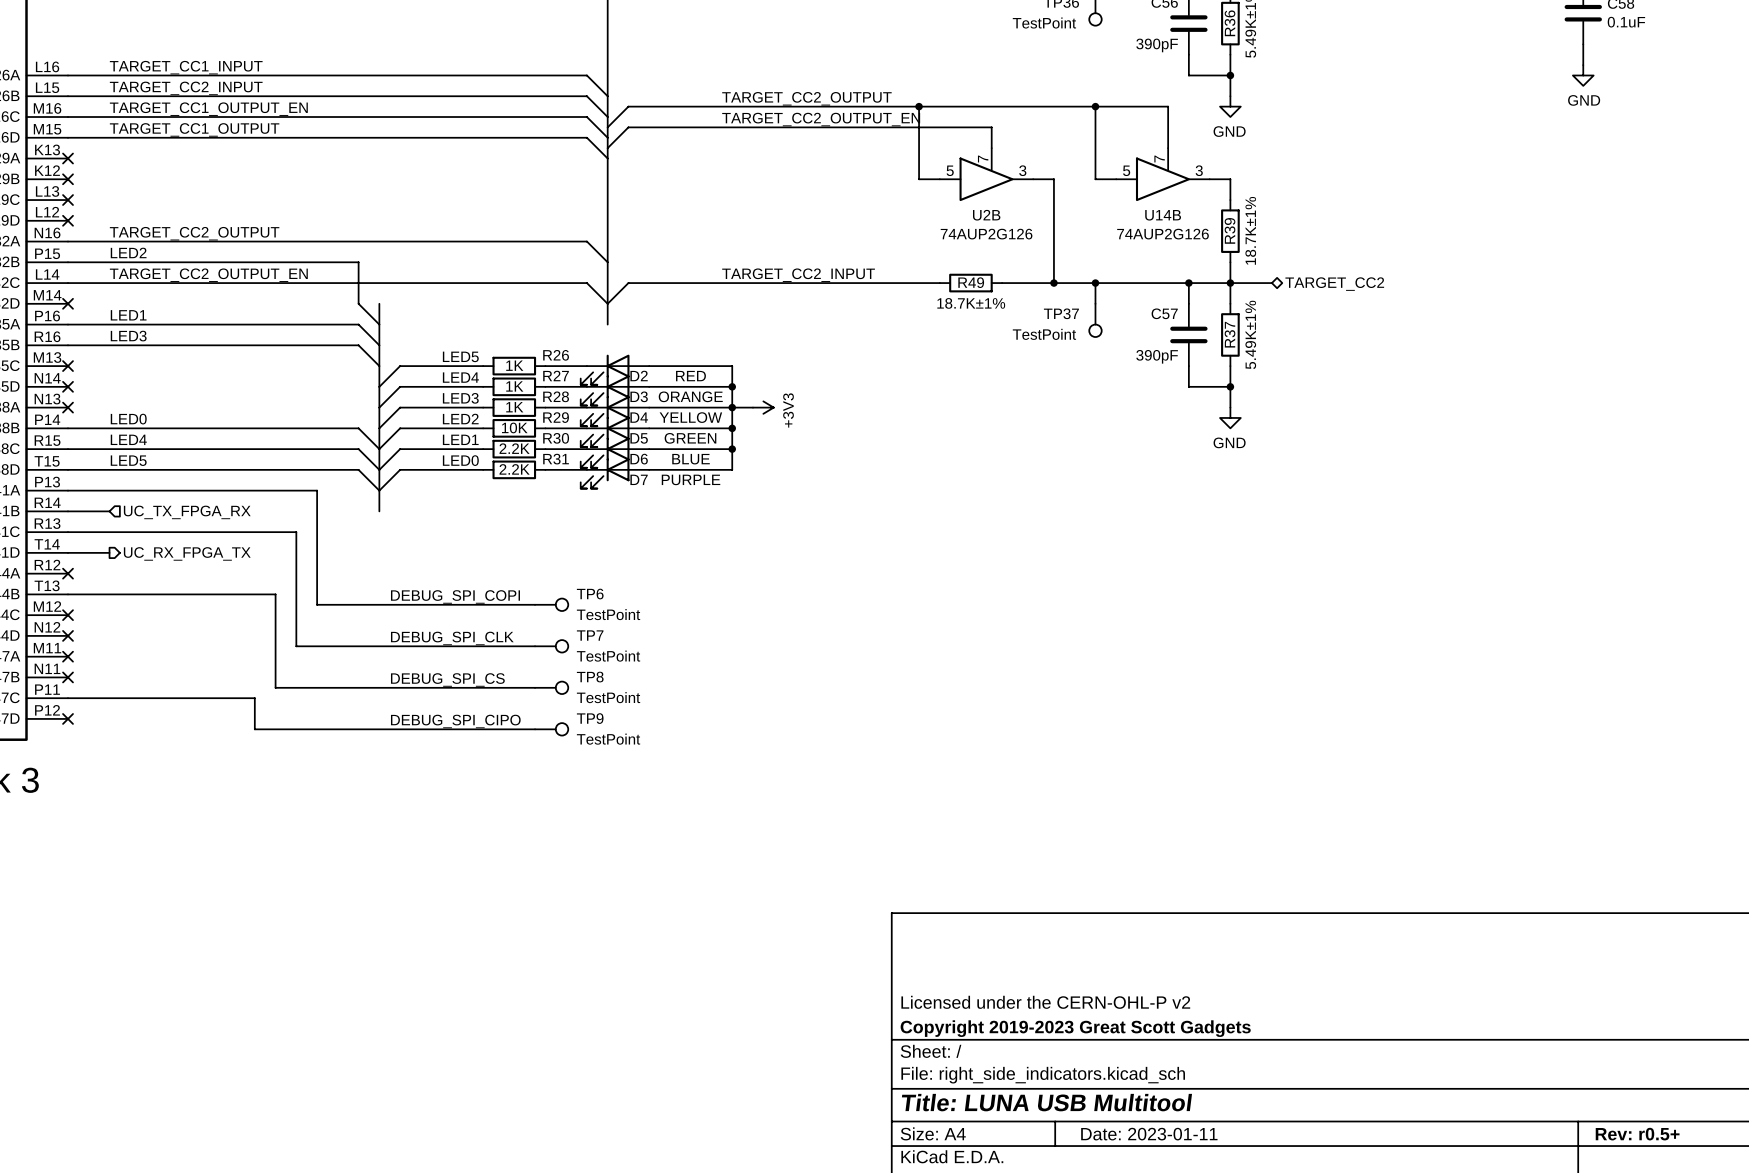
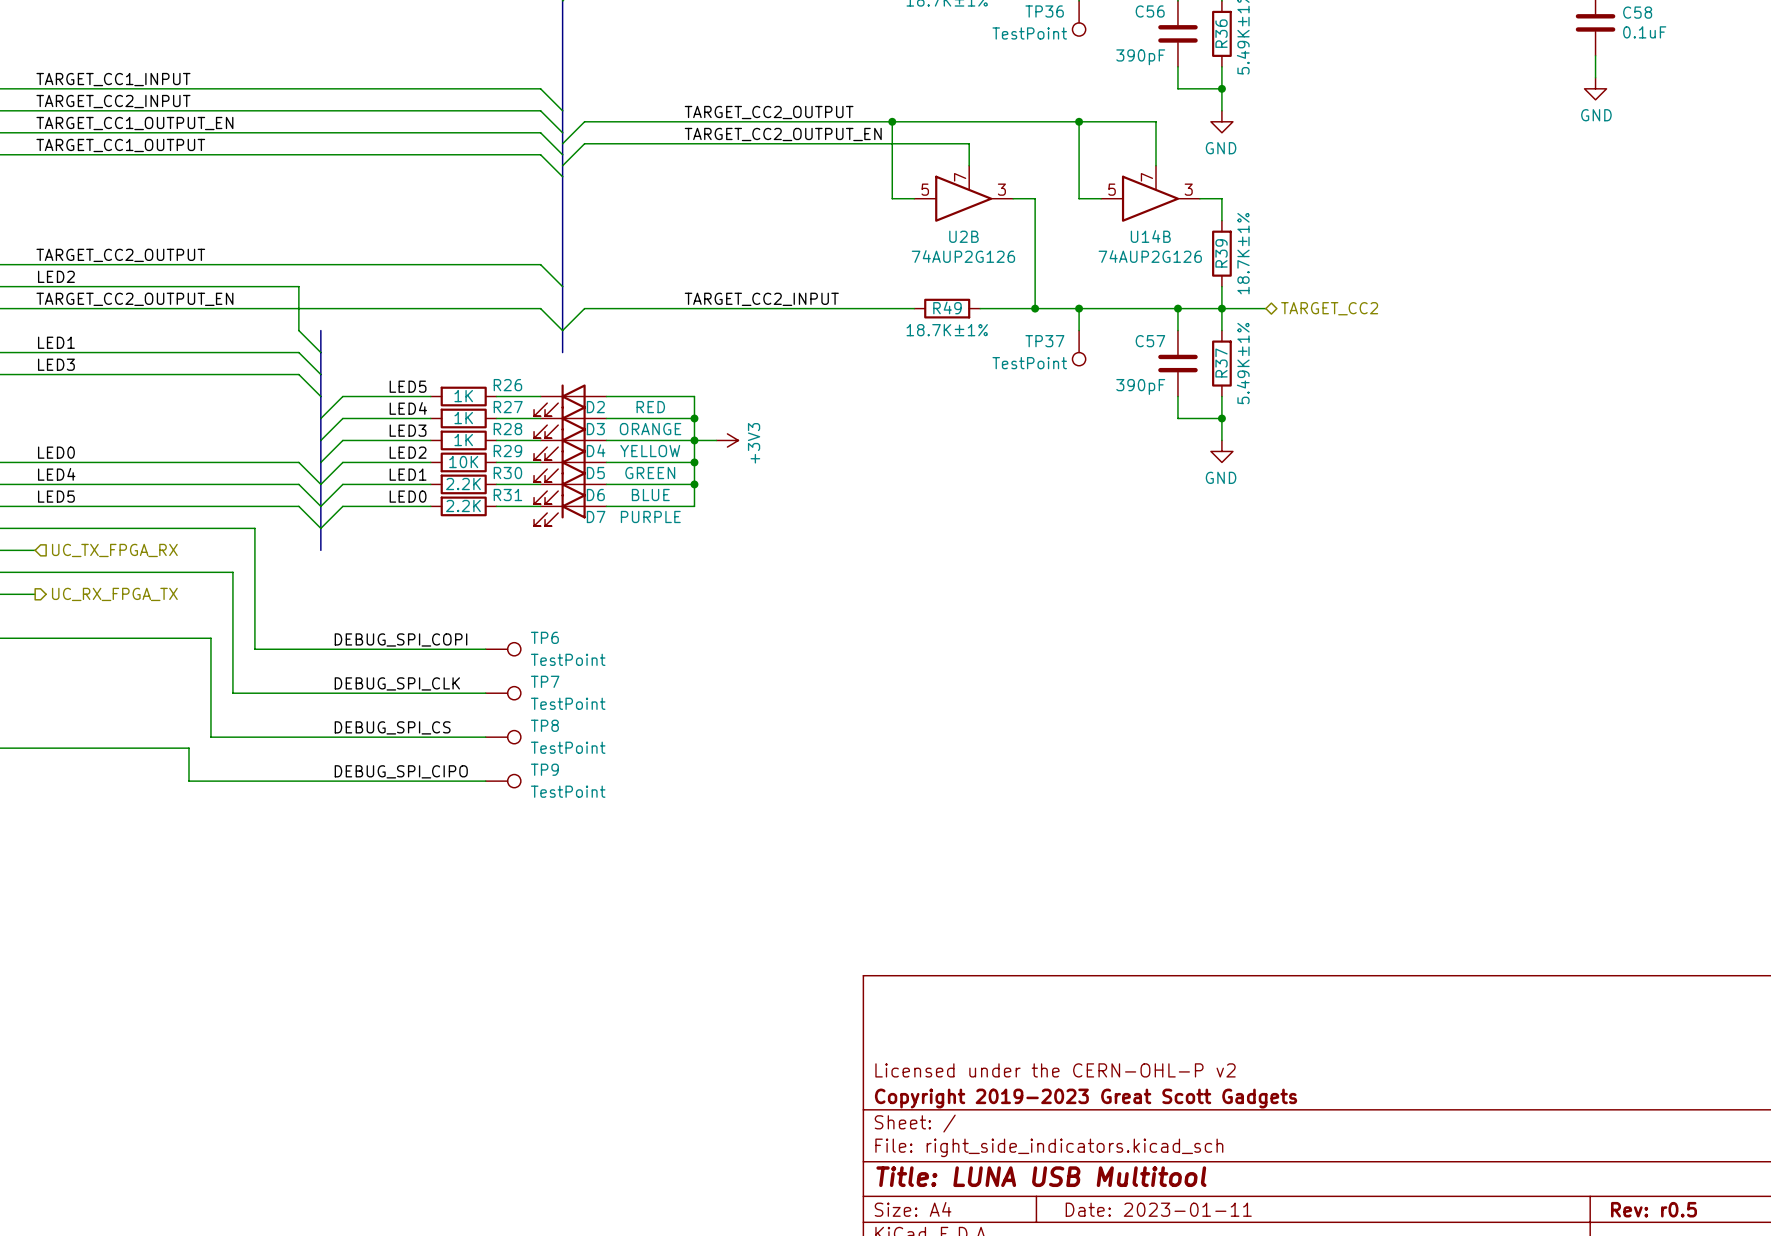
title block: Rev: r0.5+ (1637, 1134) -> Rev: r0.5 (1654, 1209)

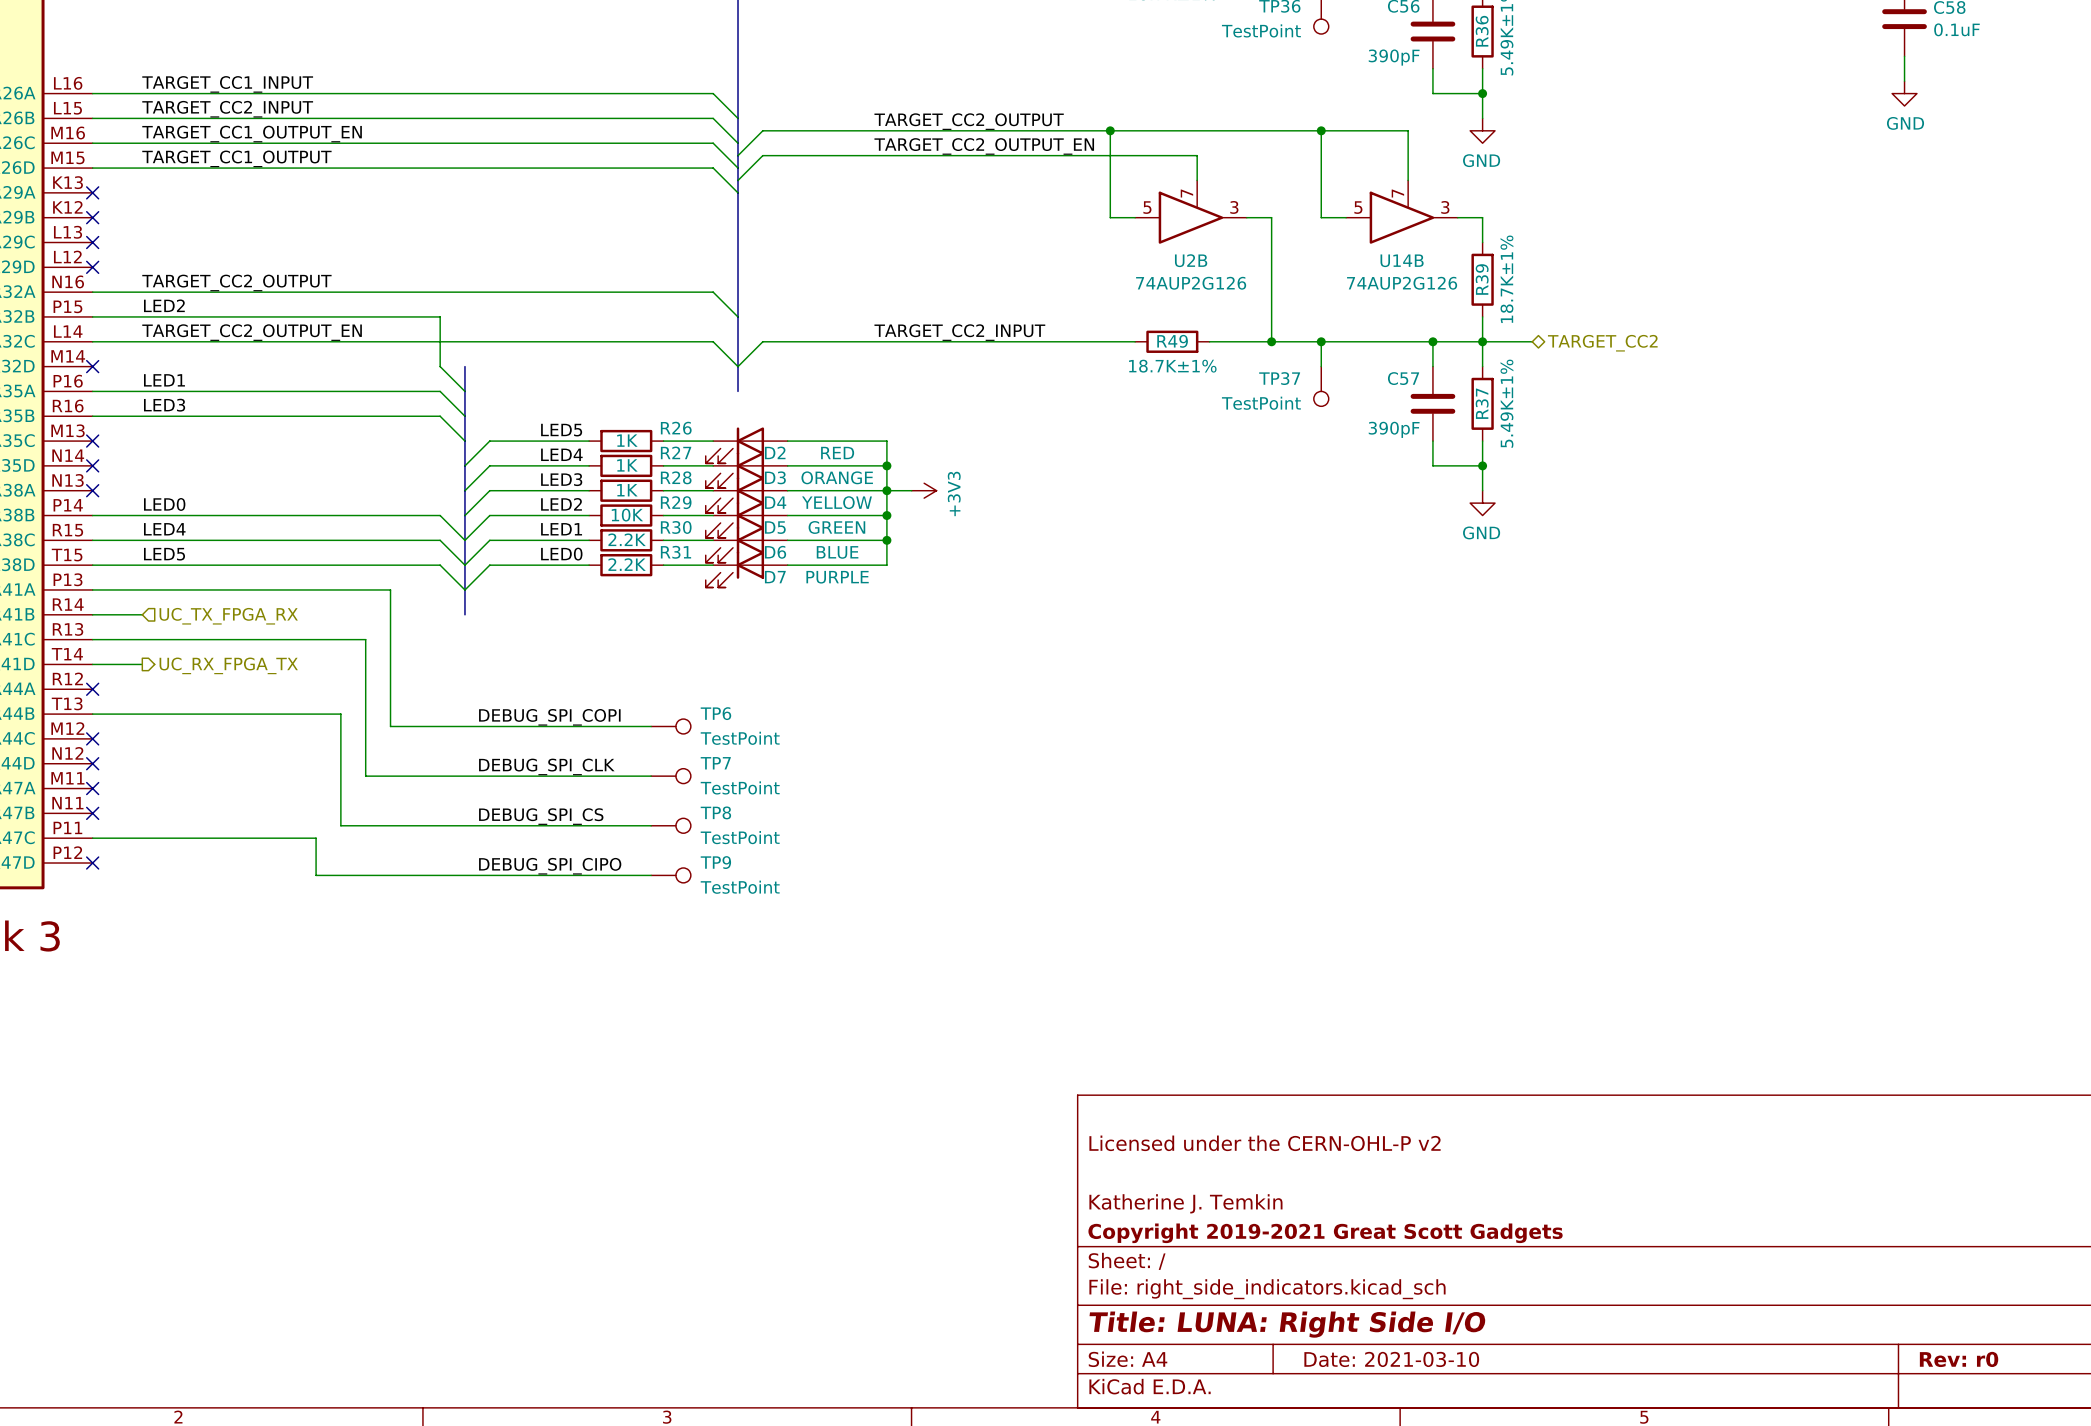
title block: none -> Licensed under the CERN-OHL-P v2 (1265, 1143)
title block: Licensed under the CERN-OHL-P v2 (1055, 1070) -> Katherine J. Temkin (1185, 1203)
title block: Copyright 2019-2023 Great Scott Gadgets (1086, 1098) -> Copyright 2019-2021 Great Scott Gadgets (1325, 1233)
title block: Title: LUNA USB Multitool (1041, 1176) -> Title: LUNA: Right Side I/O (1287, 1324)
title block: Date: 2023-01-11 (1158, 1209) -> Date: 2021-03-10 (1391, 1359)
title block: Rev: r0.5 (1654, 1209) -> Rev: r0 (1959, 1359)

